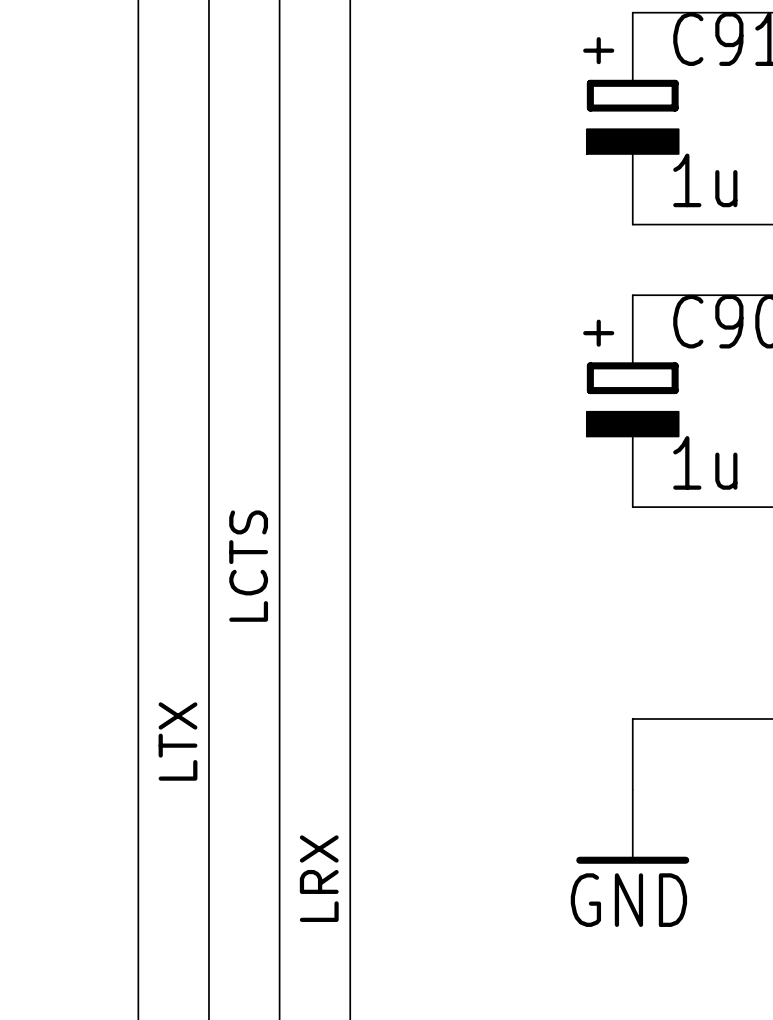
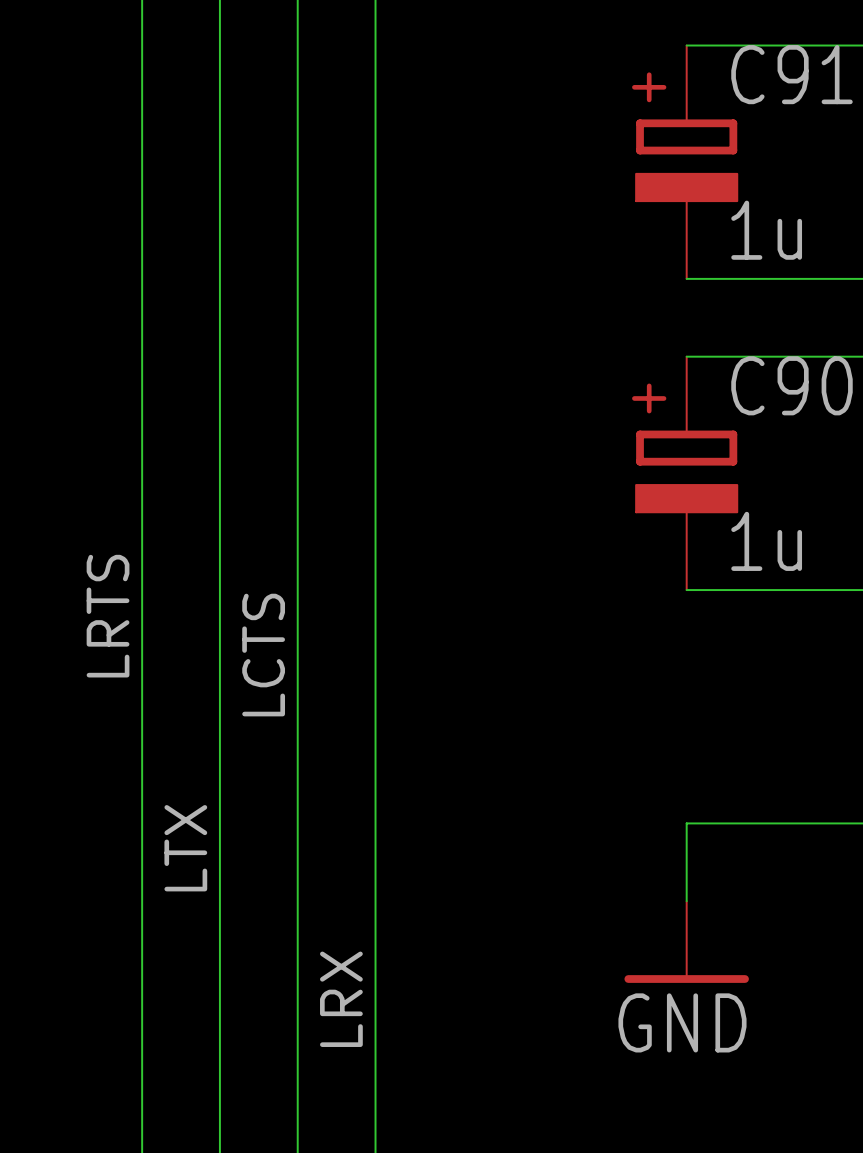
label: none -> LRTS (108, 616)

